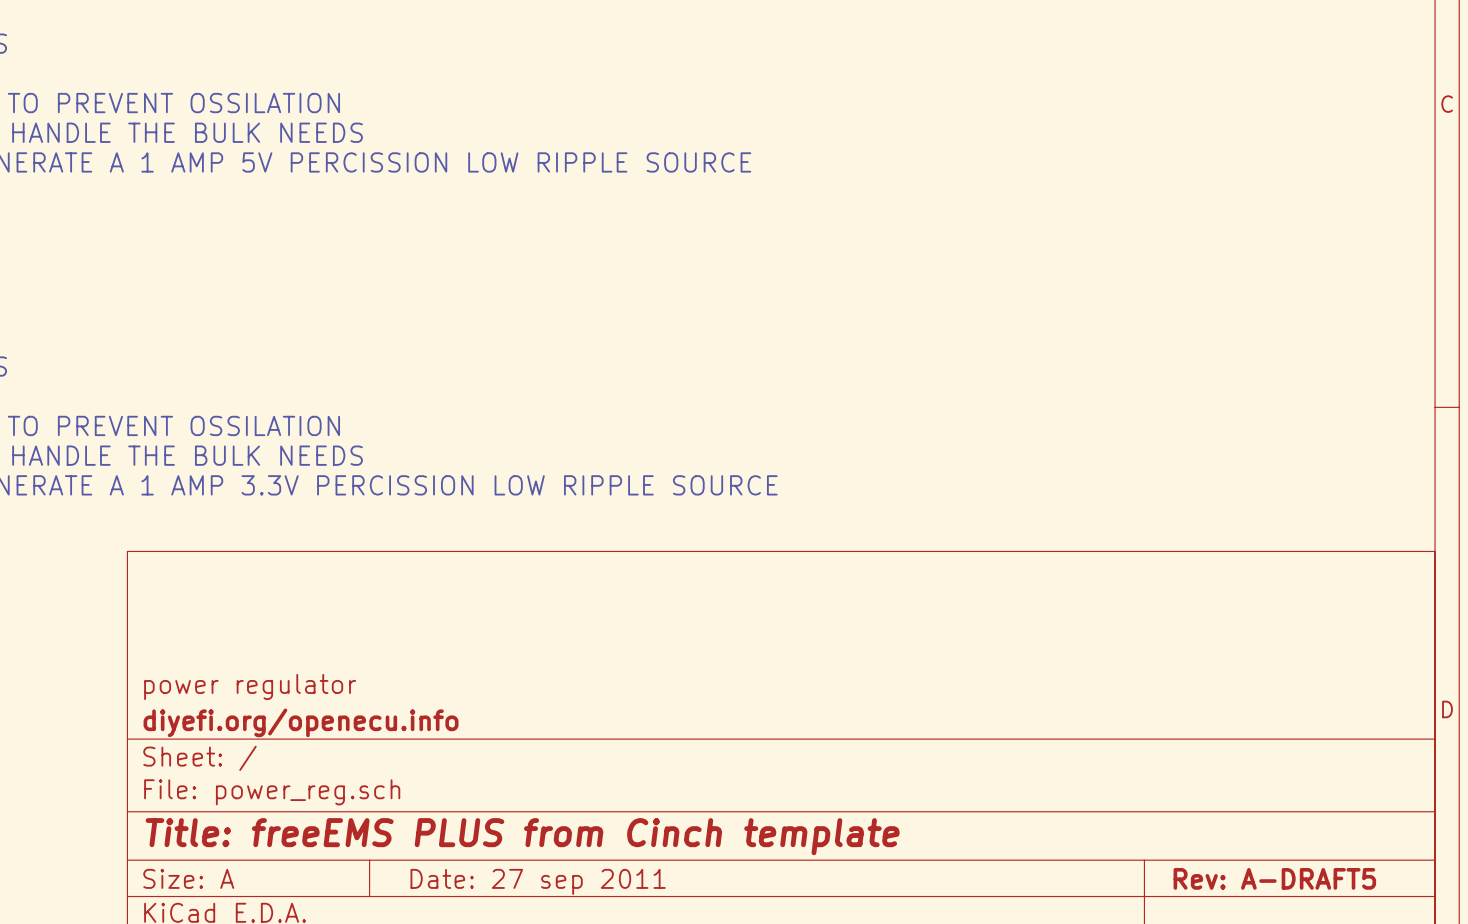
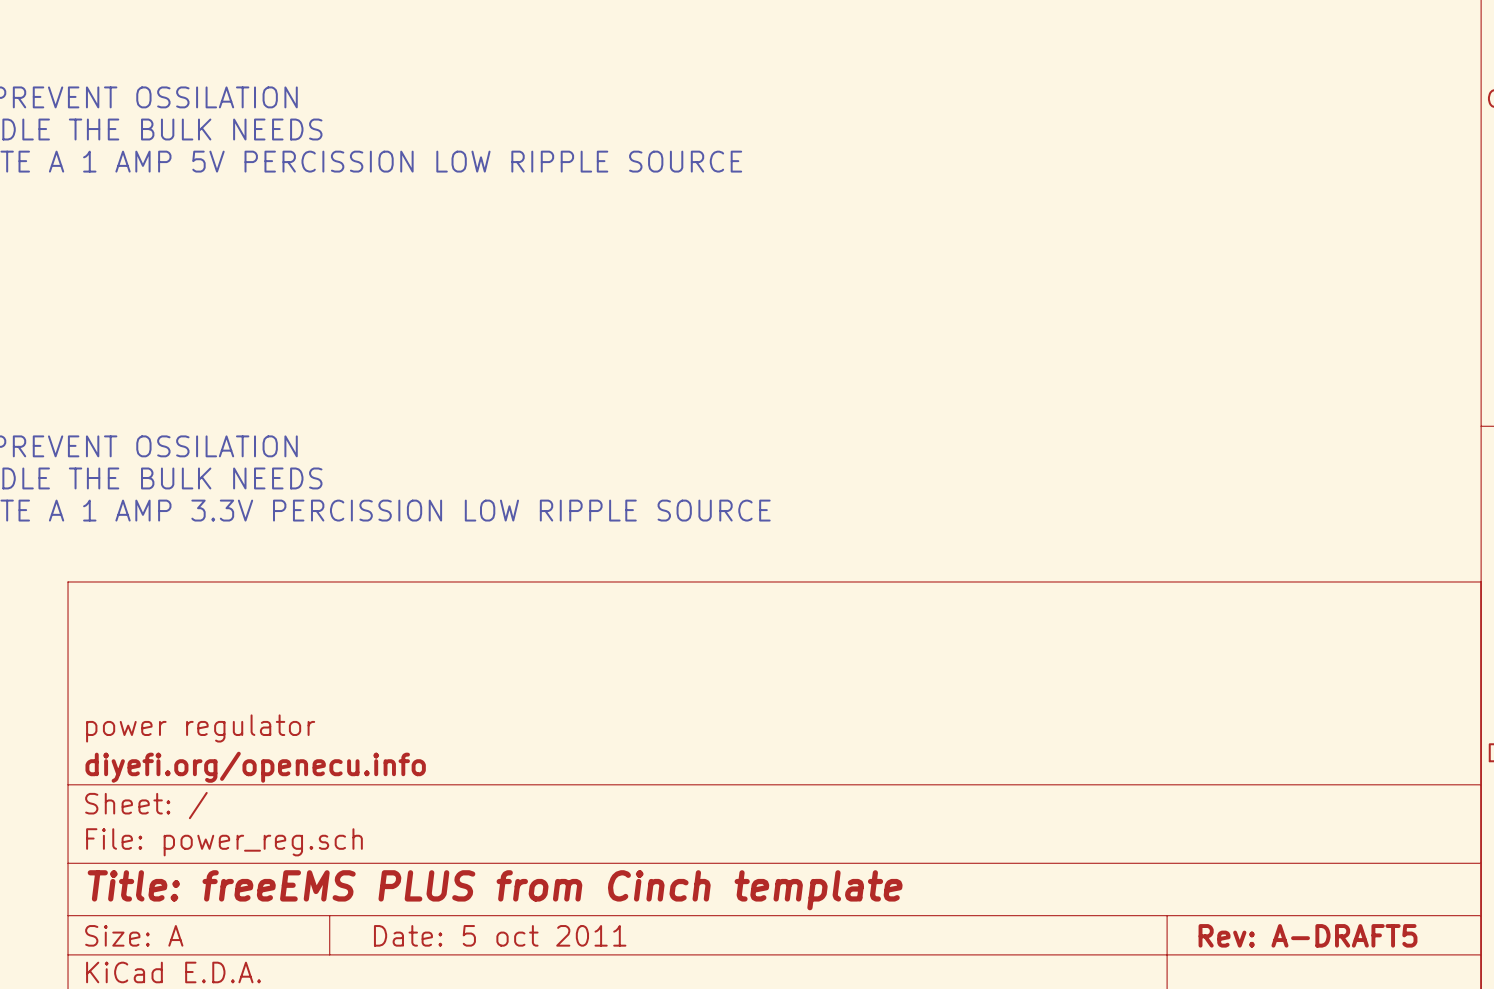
title block: Date: 27 sep 2011 (538, 881) -> Date: 5 oct 2011 (500, 935)

